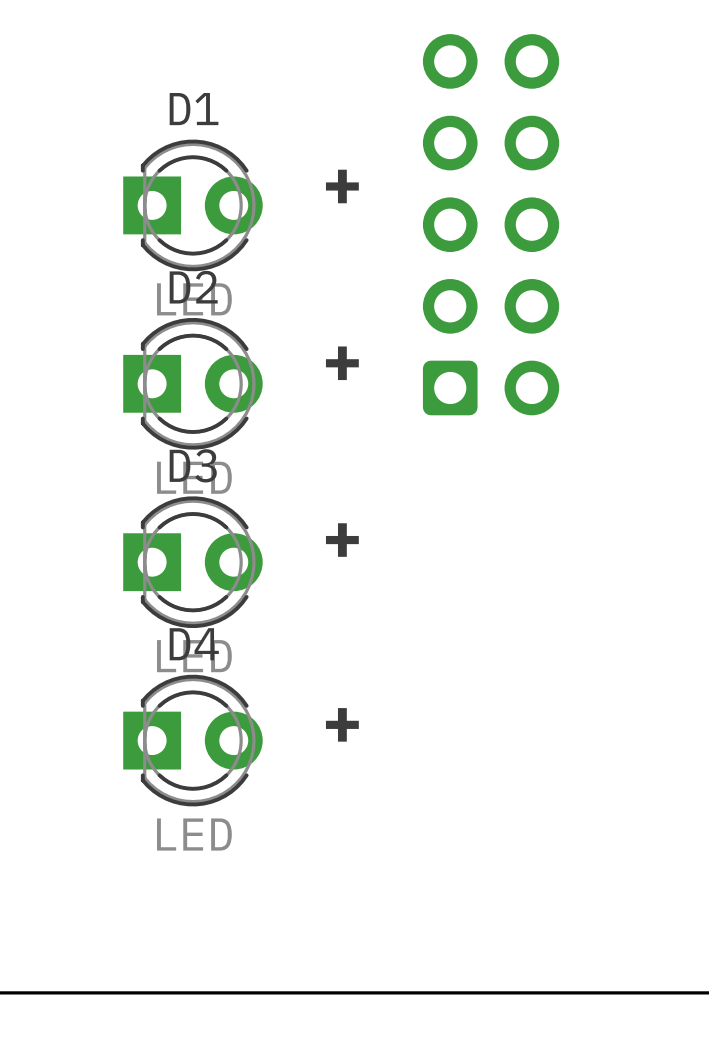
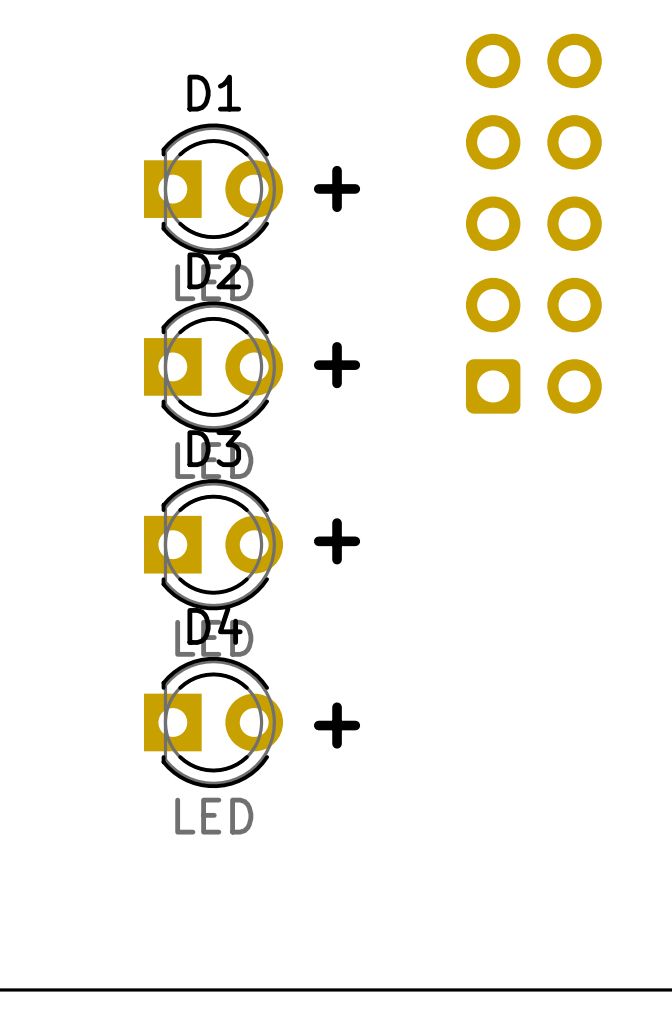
D1 position: (192, 205) -> (213, 189)
part position: (491, 224) -> (533, 223)
D2 position: (192, 383) -> (213, 366)
D3 position: (192, 562) -> (213, 544)
D4 position: (192, 740) -> (213, 722)

